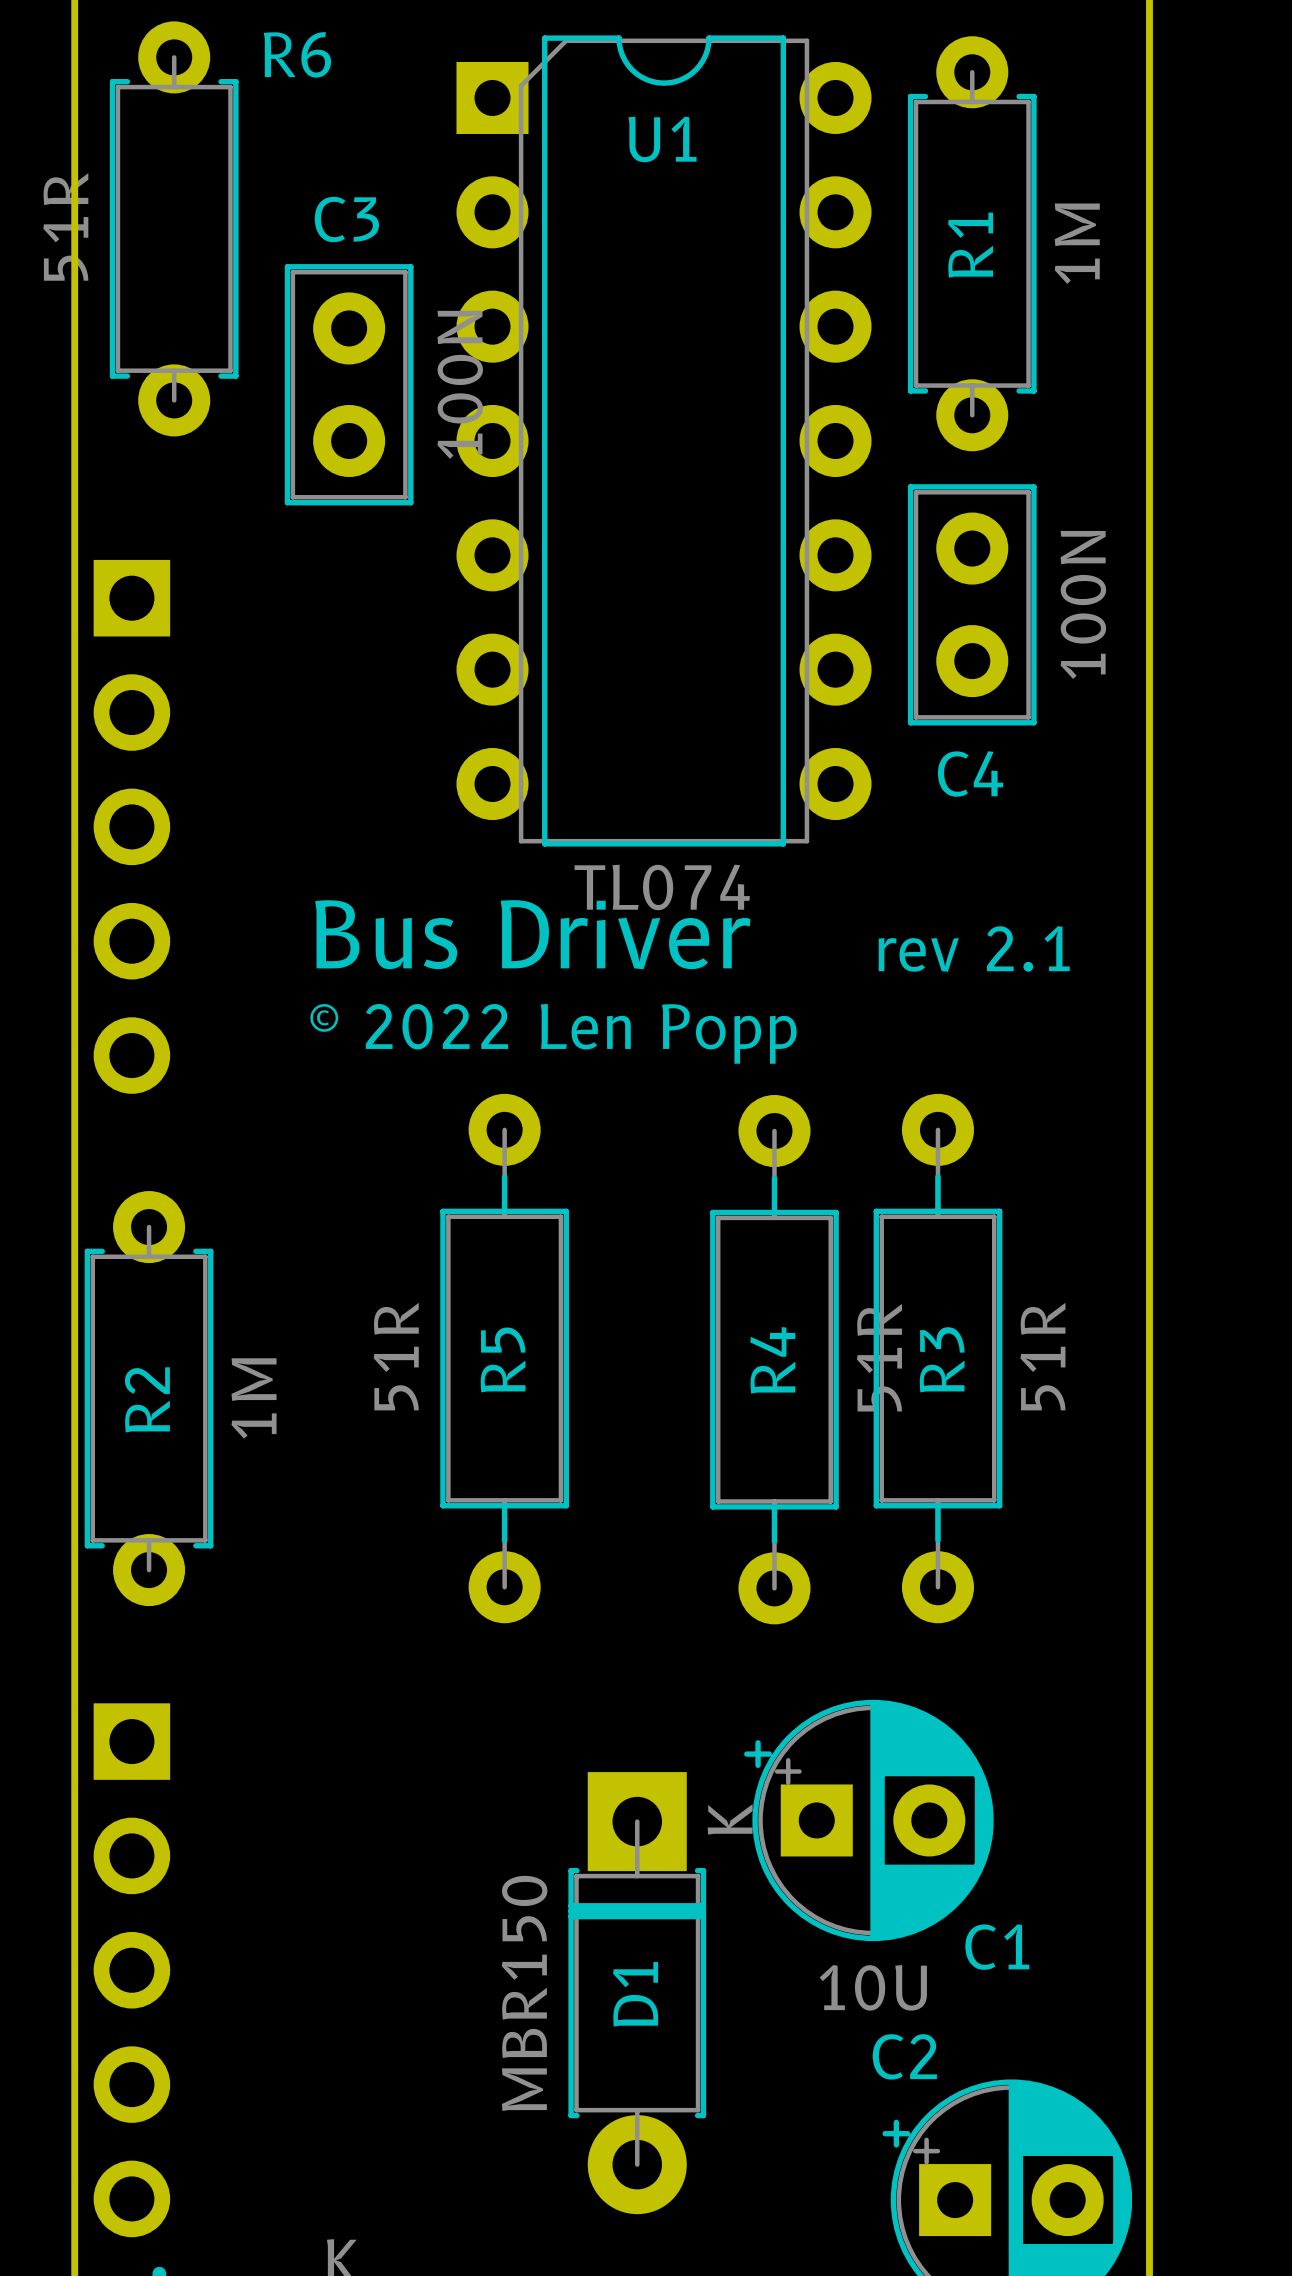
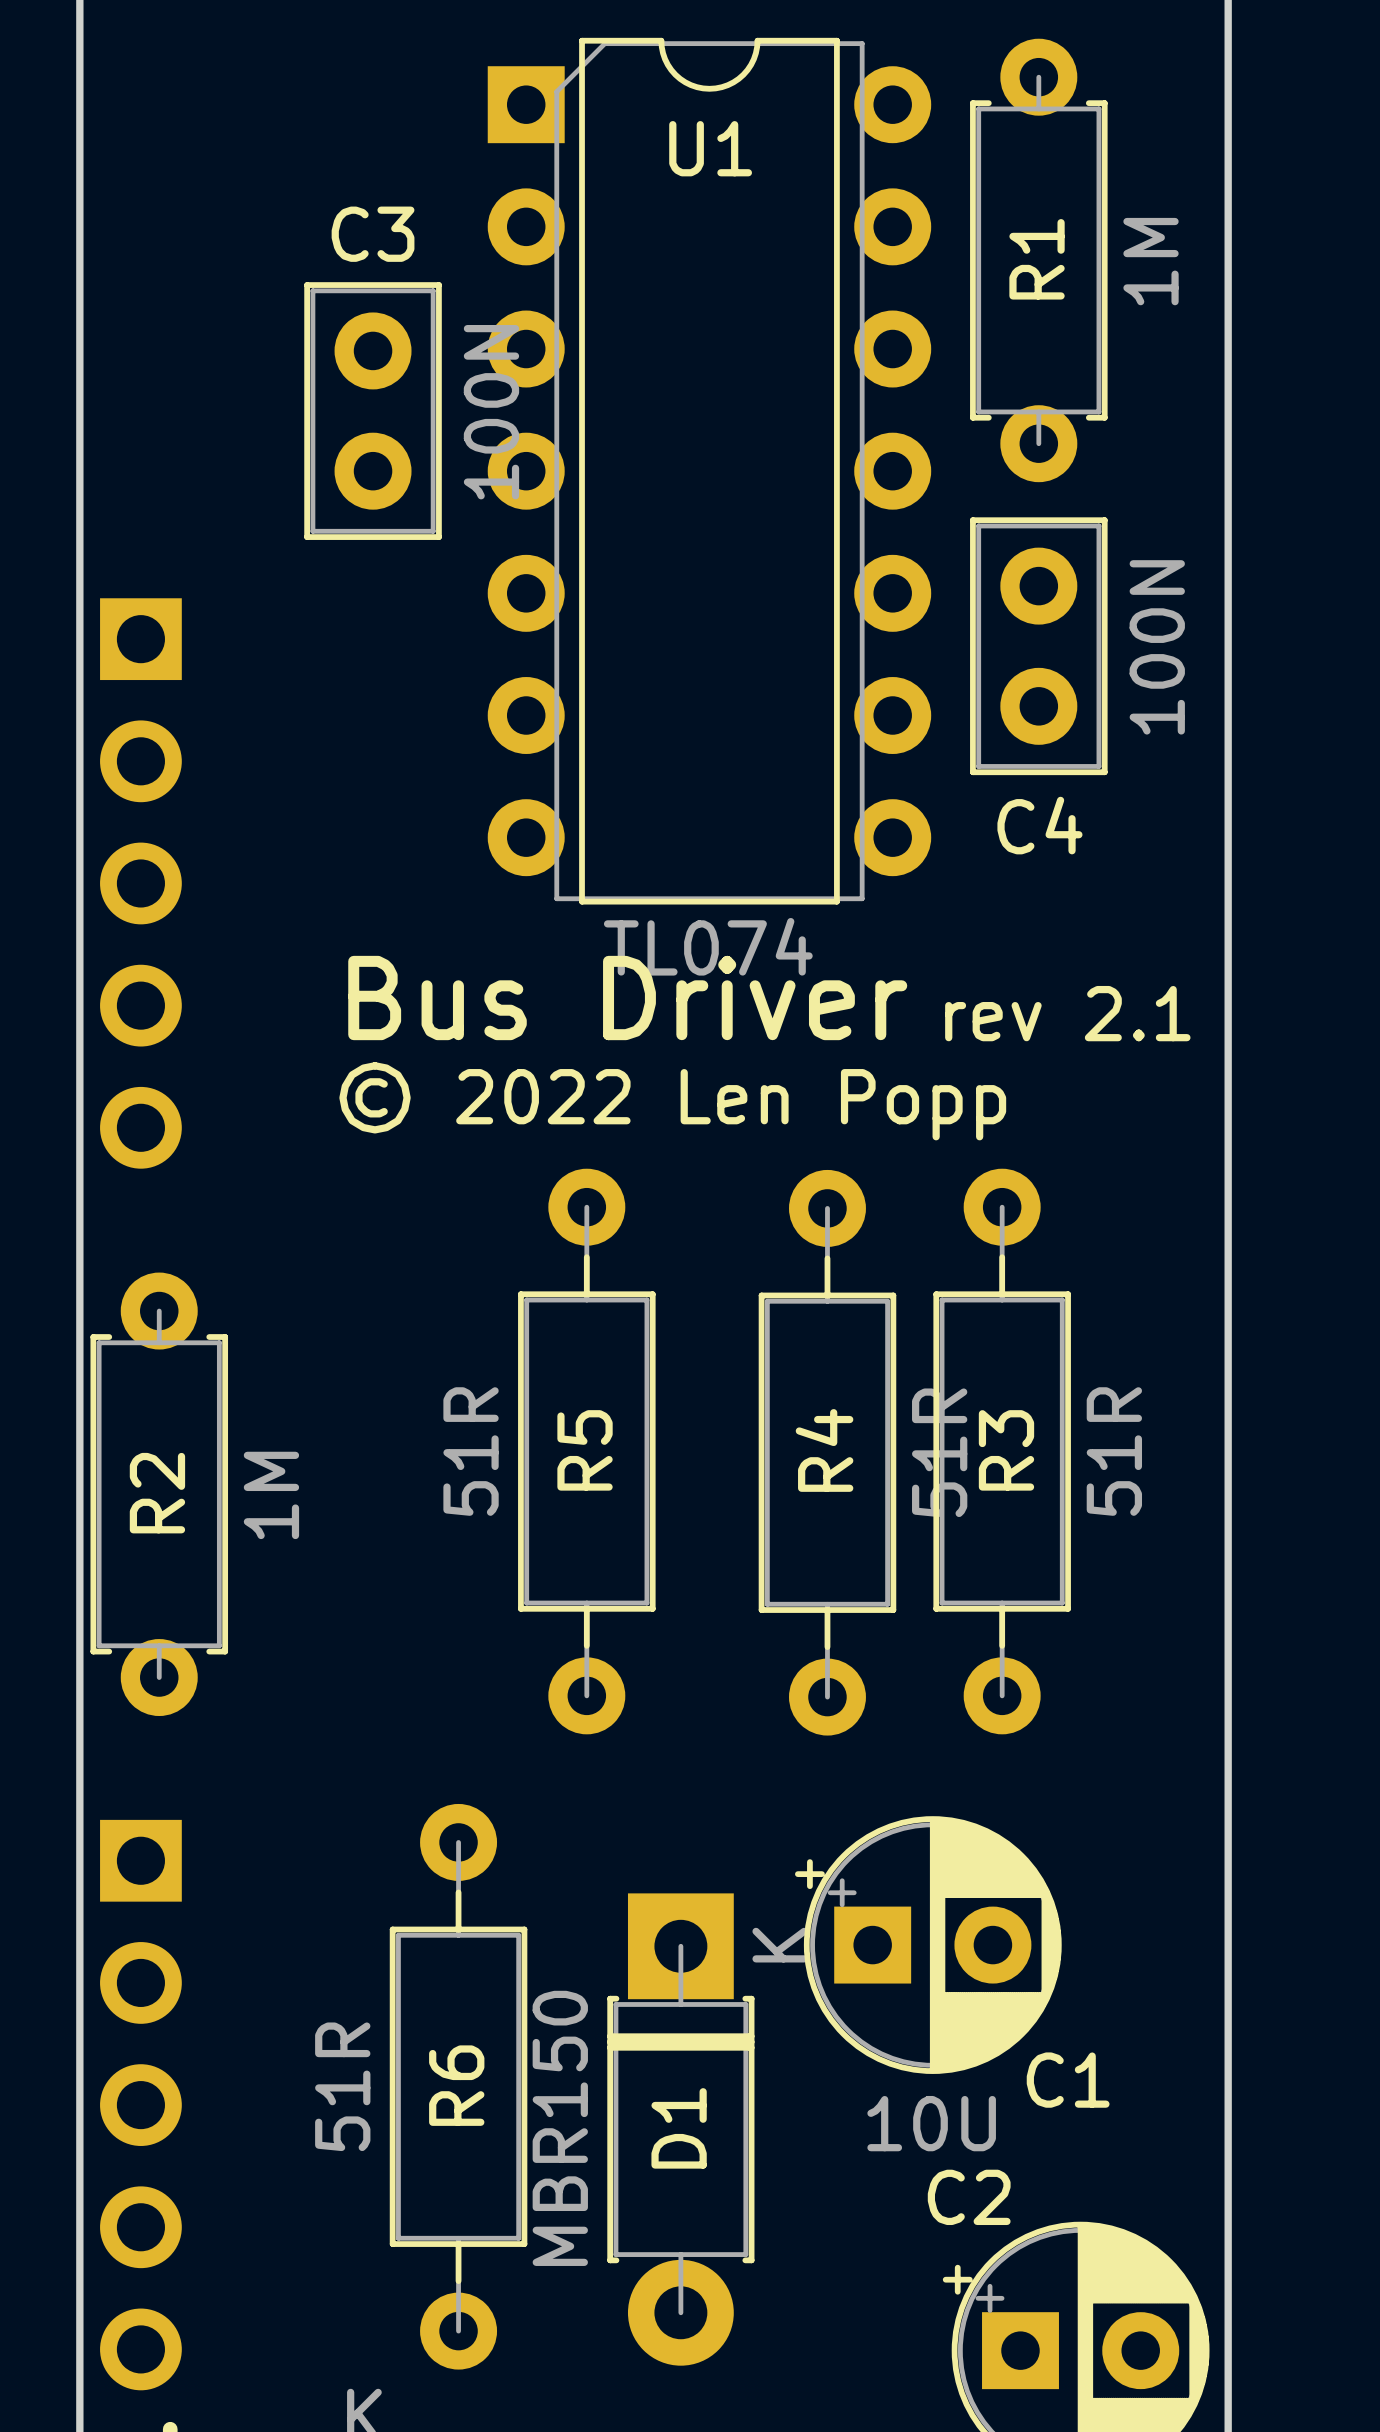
R6 footprint: [109, 21, 239, 437] -> [389, 1803, 528, 2370]
R6 name position: R6 (297, 54) -> R6 (456, 2085)
R5 position: (504, 1358) -> (586, 1451)

